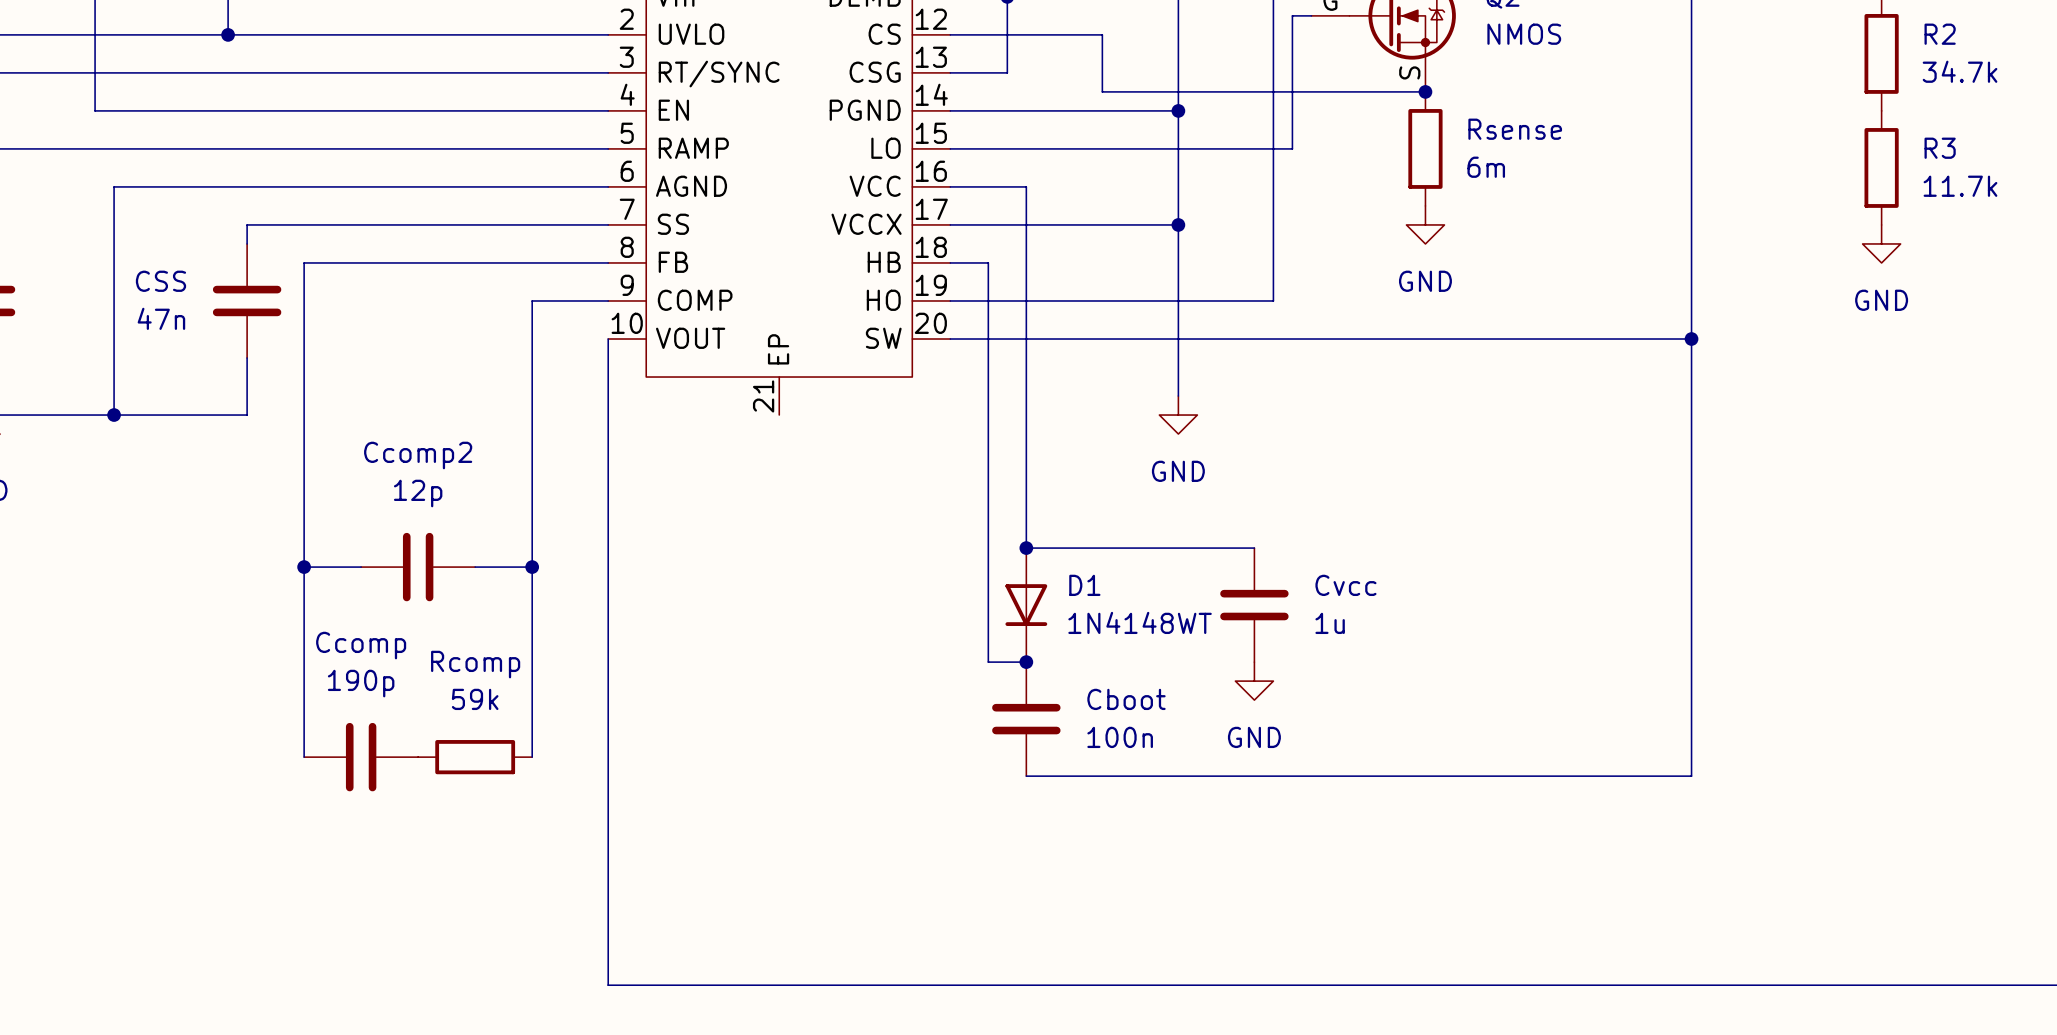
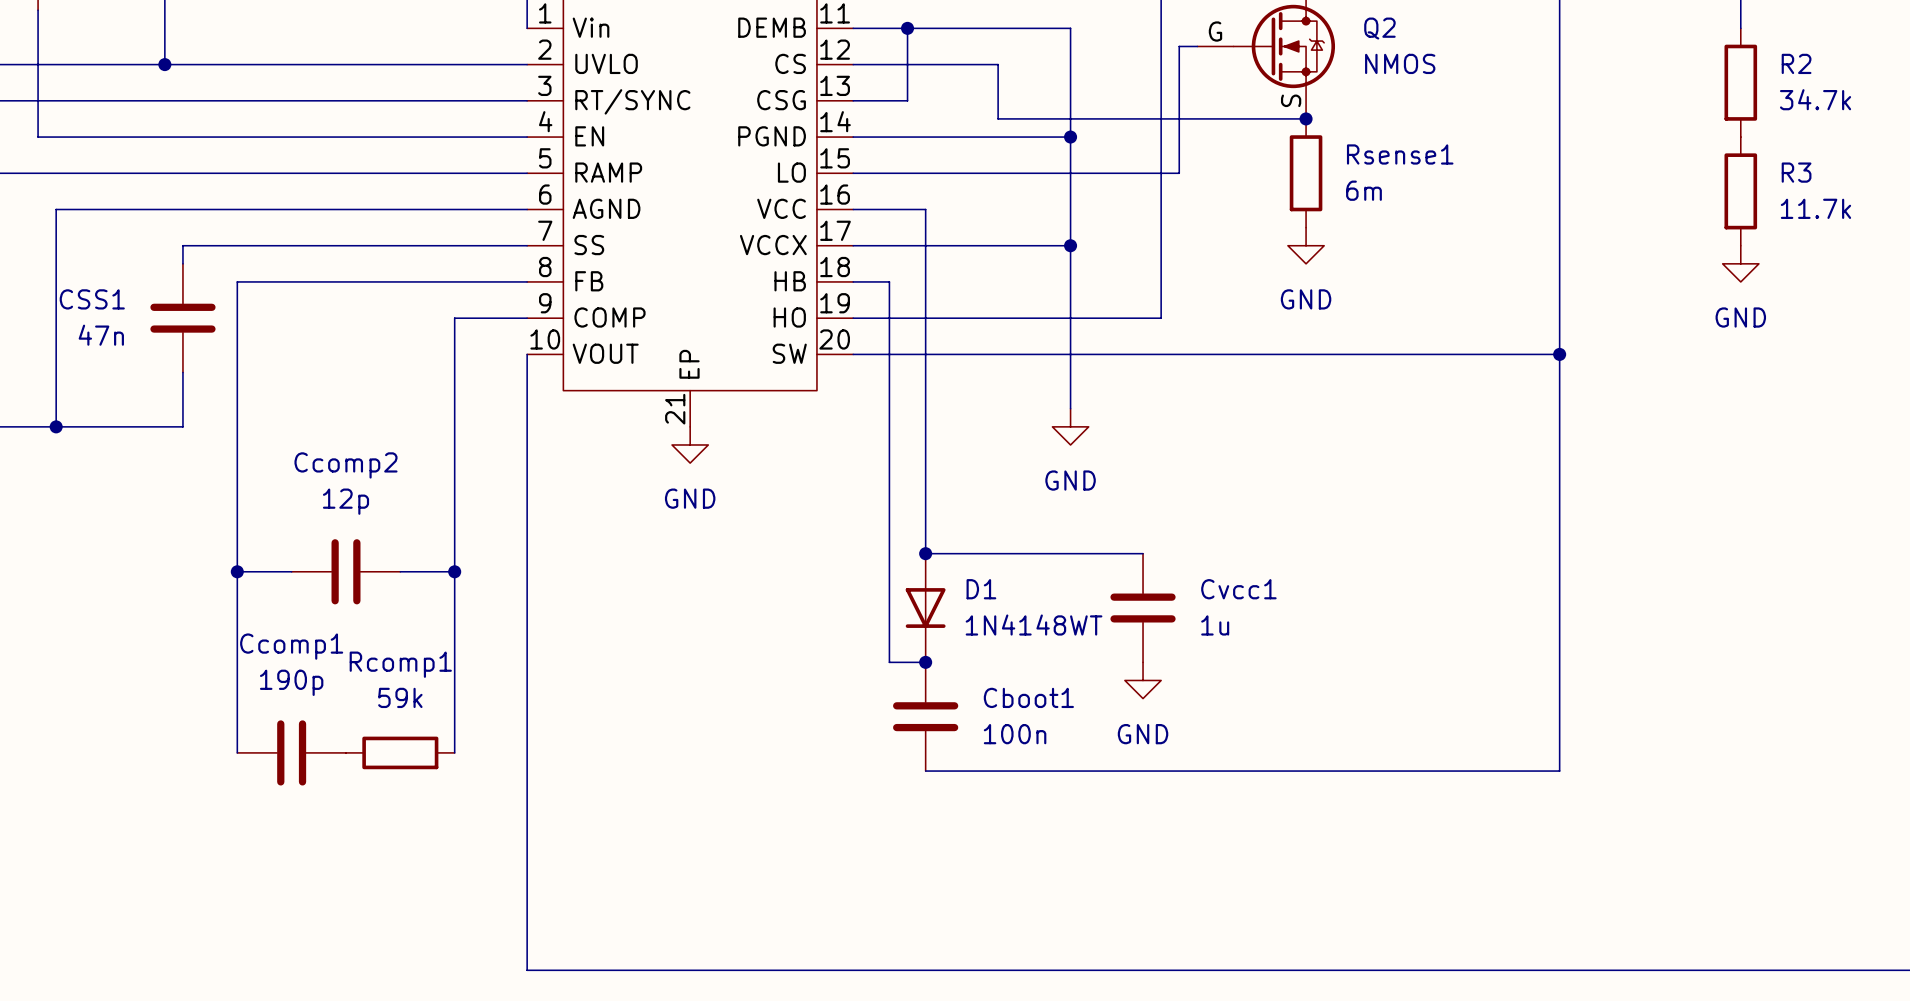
Rsense name: Rsense (1515, 129) -> Rsense1 (1400, 154)
CSS name: CSS (160, 281) -> CSS1 (92, 299)
power symbol: none -> GND (690, 444)
Cvcc name: Cvcc (1345, 585) -> Cvcc1 (1238, 589)
Ccomp name: Ccomp (361, 645) -> Ccomp1 (291, 646)
Rcomp name: Rcomp (475, 664) -> Rcomp1 (400, 664)
Cboot name: Cboot (1126, 699) -> Cboot1 (1028, 697)

